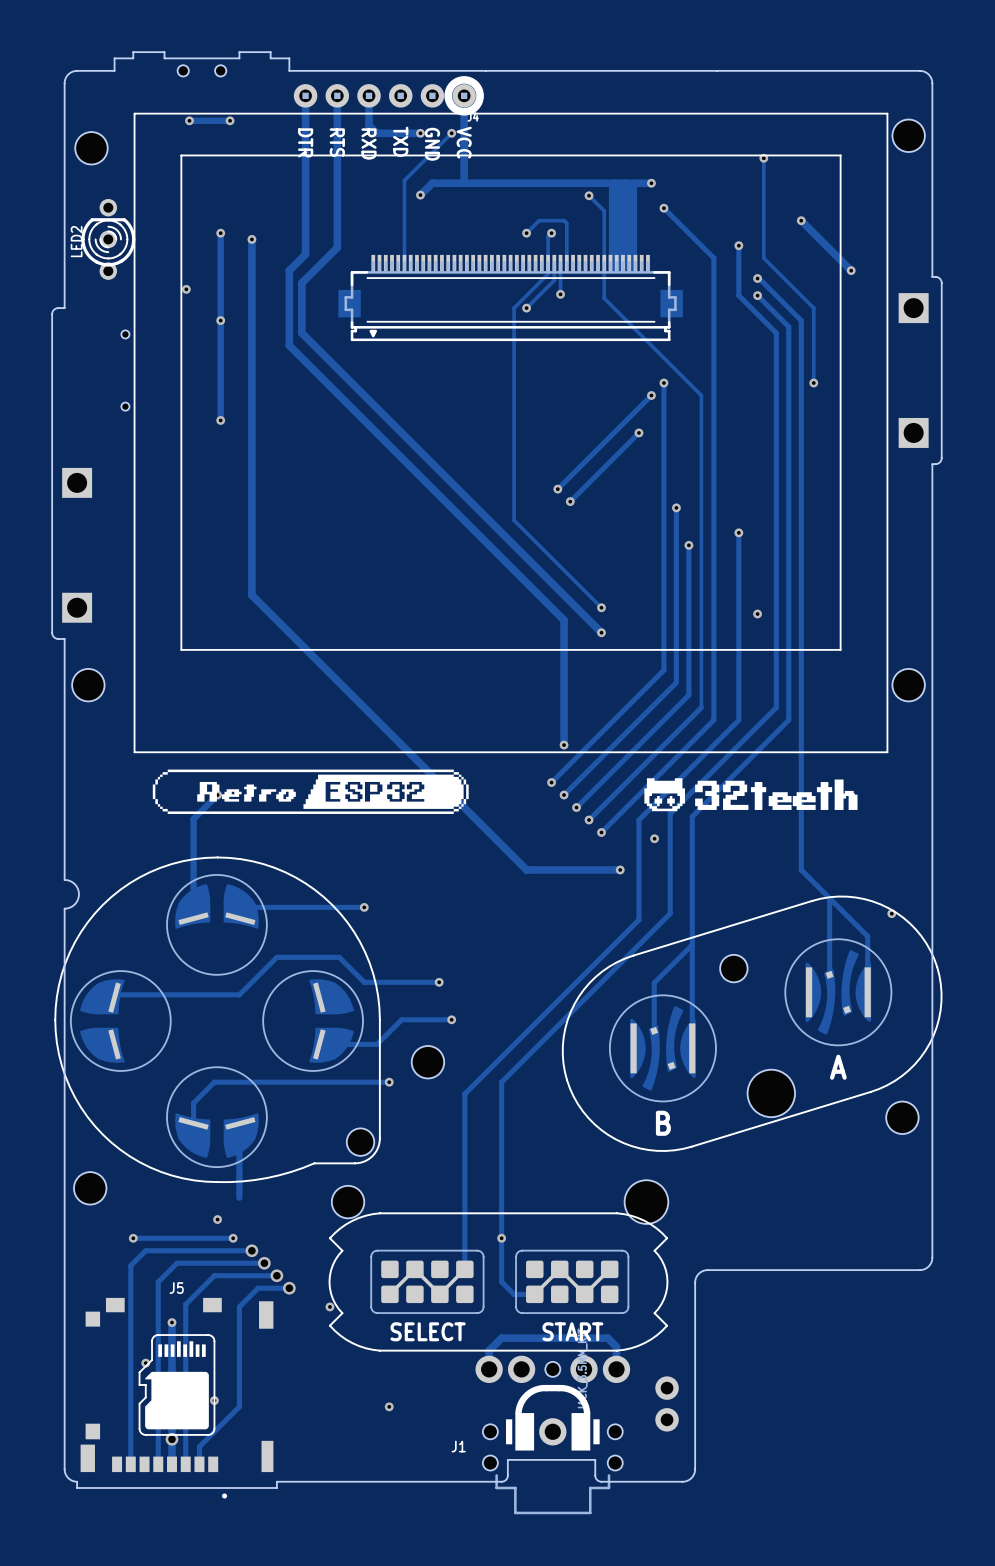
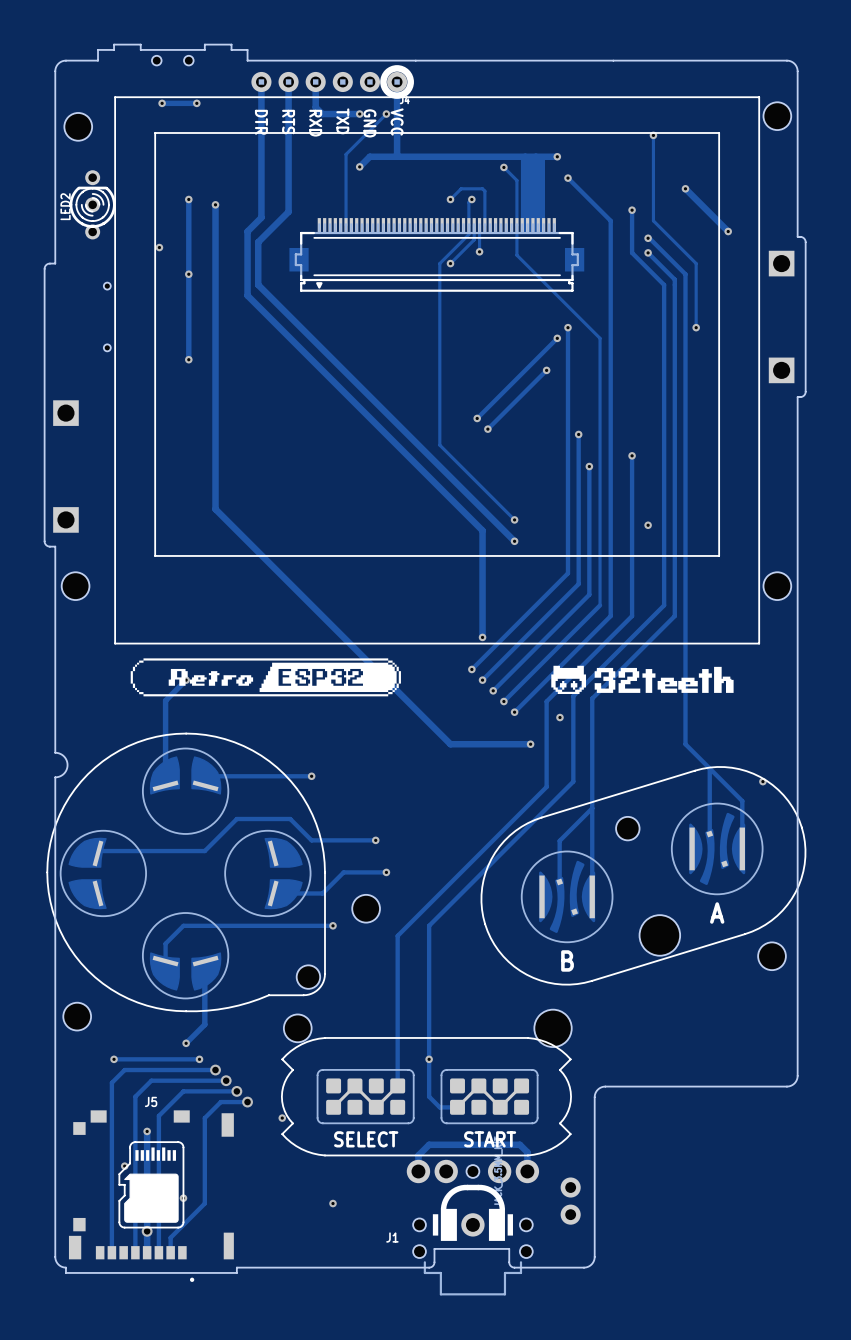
track: none -> (204, 1024) (186, 1043)

